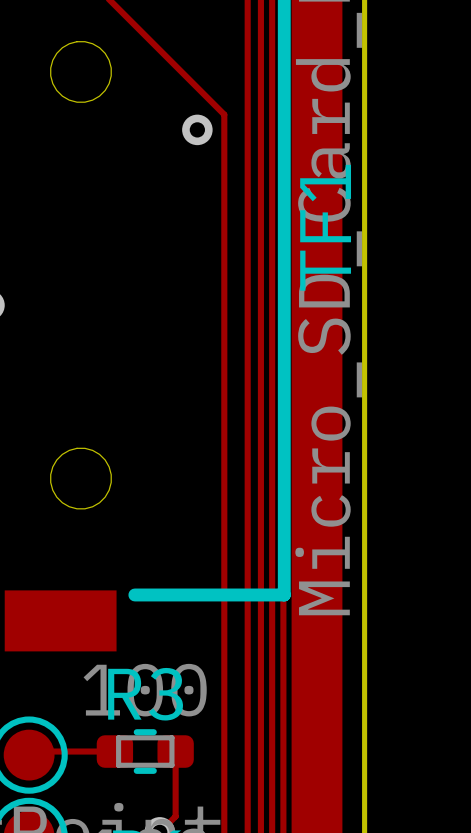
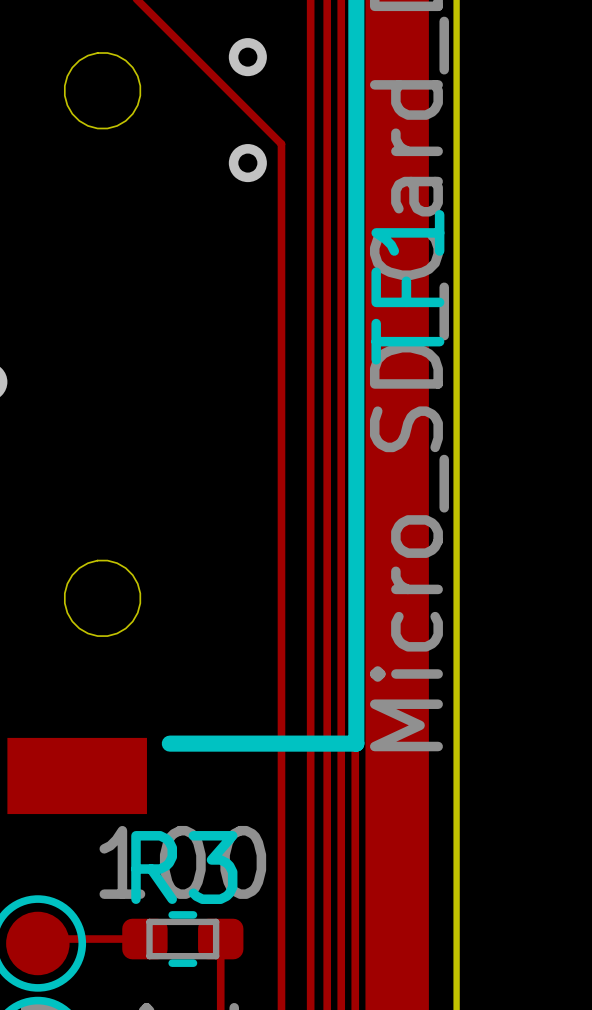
via: none -> (247, 57)

